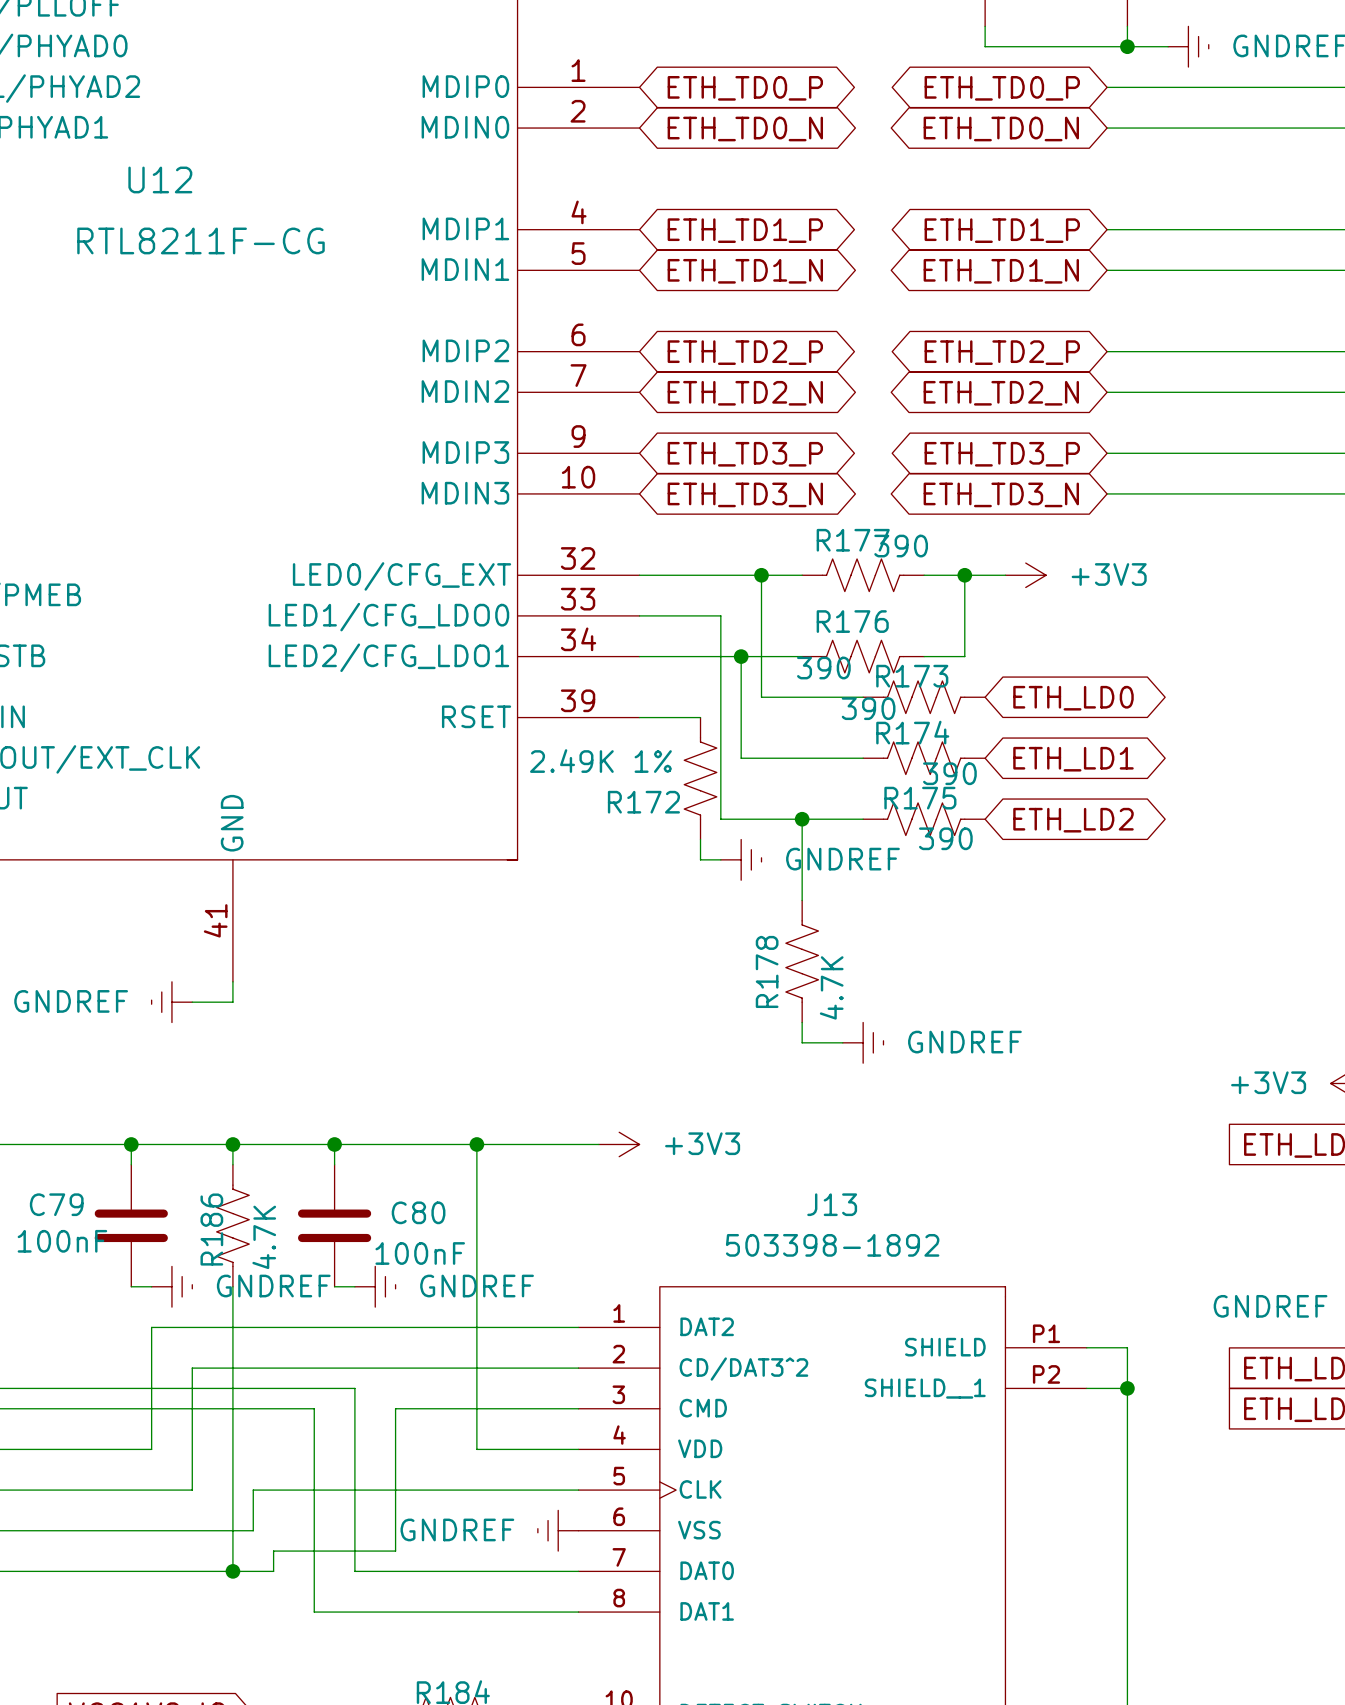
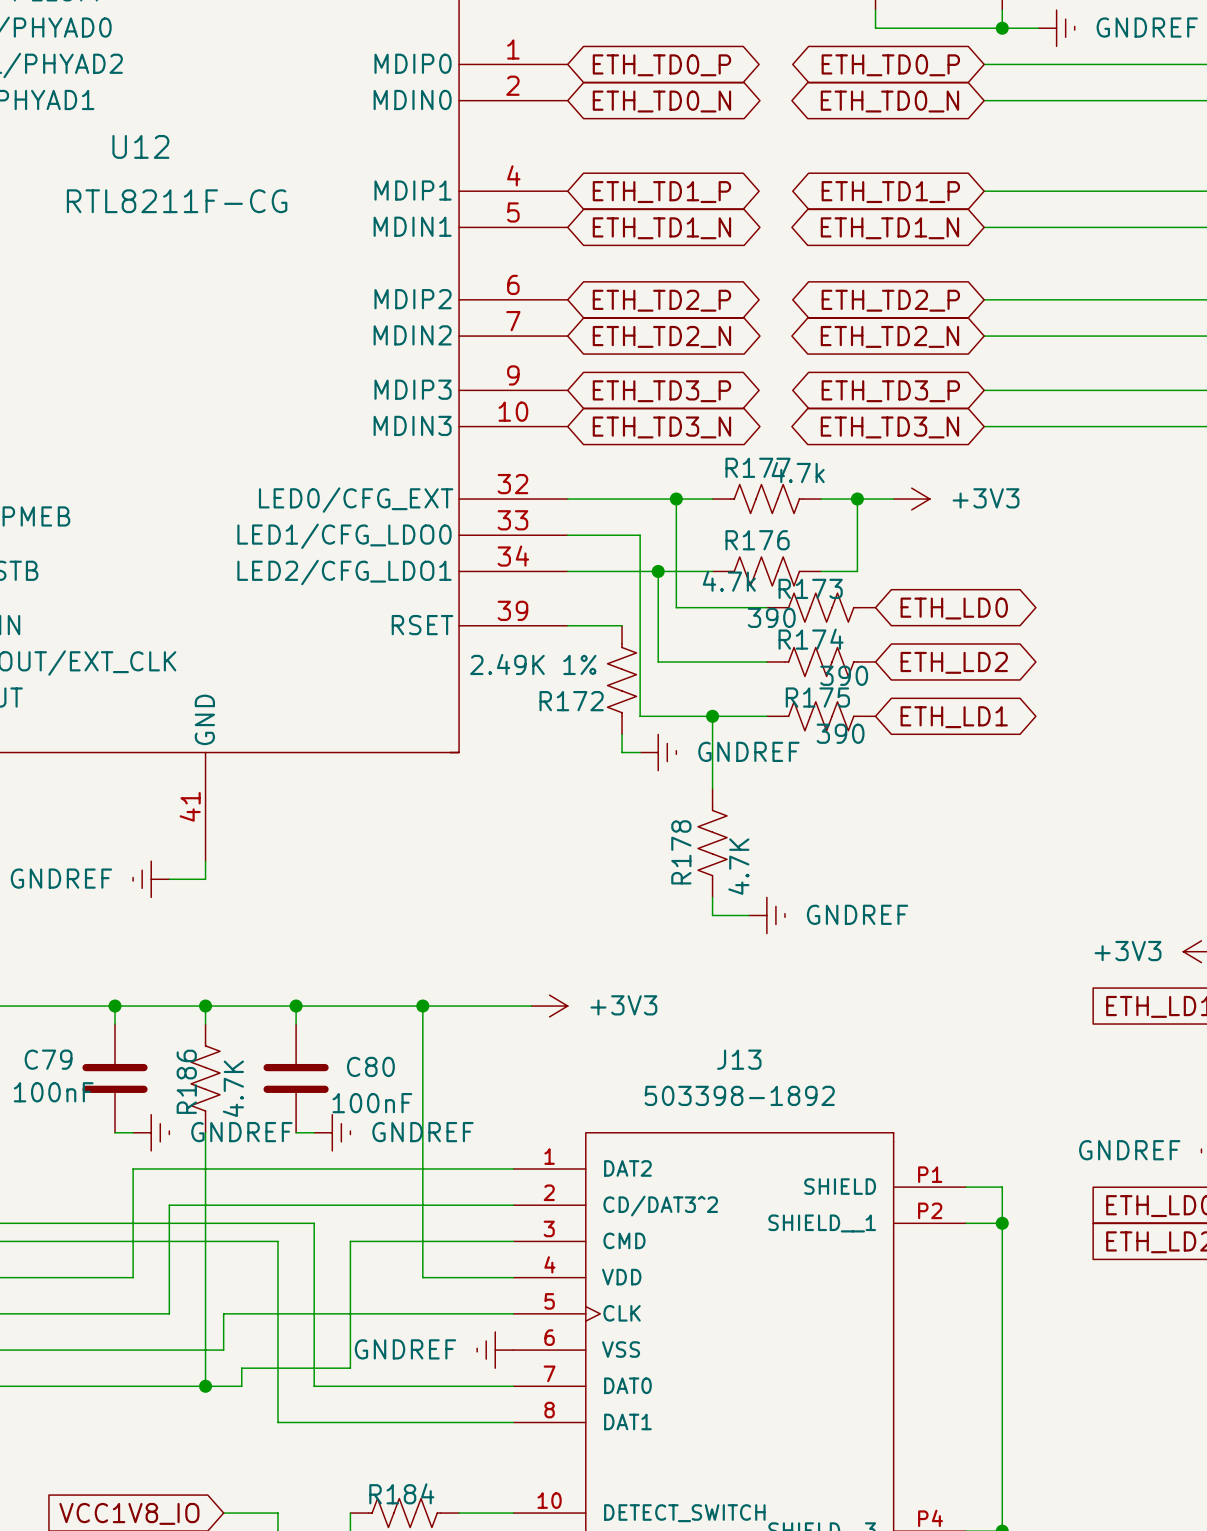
R177 value: 390 (901, 546) -> 4.7k (798, 472)
R176 value: 390 (823, 668) -> 4.7k (729, 581)
global label: ETH_LD1 (1073, 759) -> ETH_LD2 (954, 662)
global label: ETH_LD2 (1073, 820) -> ETH_LD1 (954, 717)

